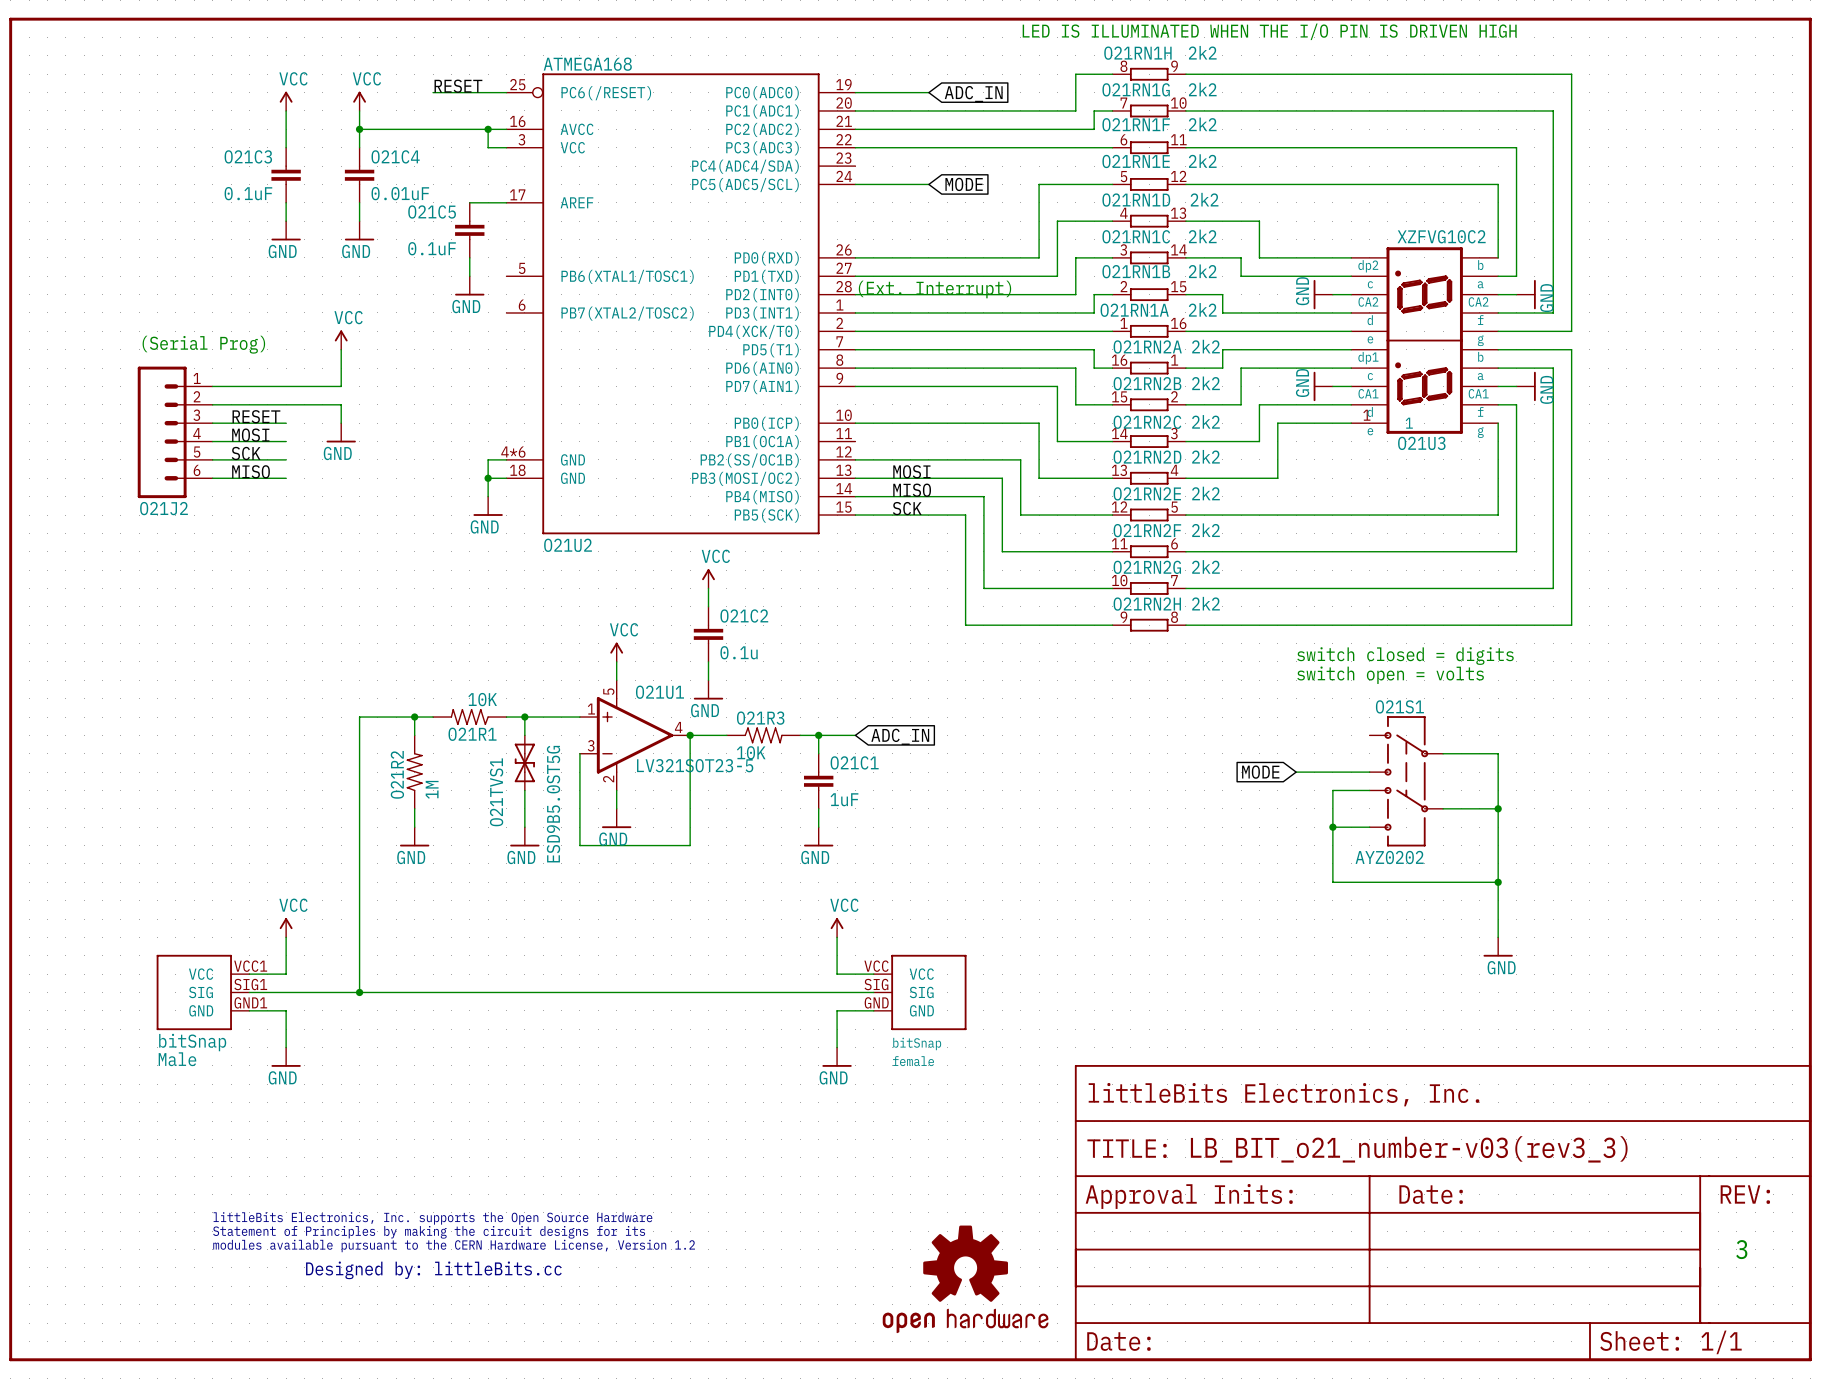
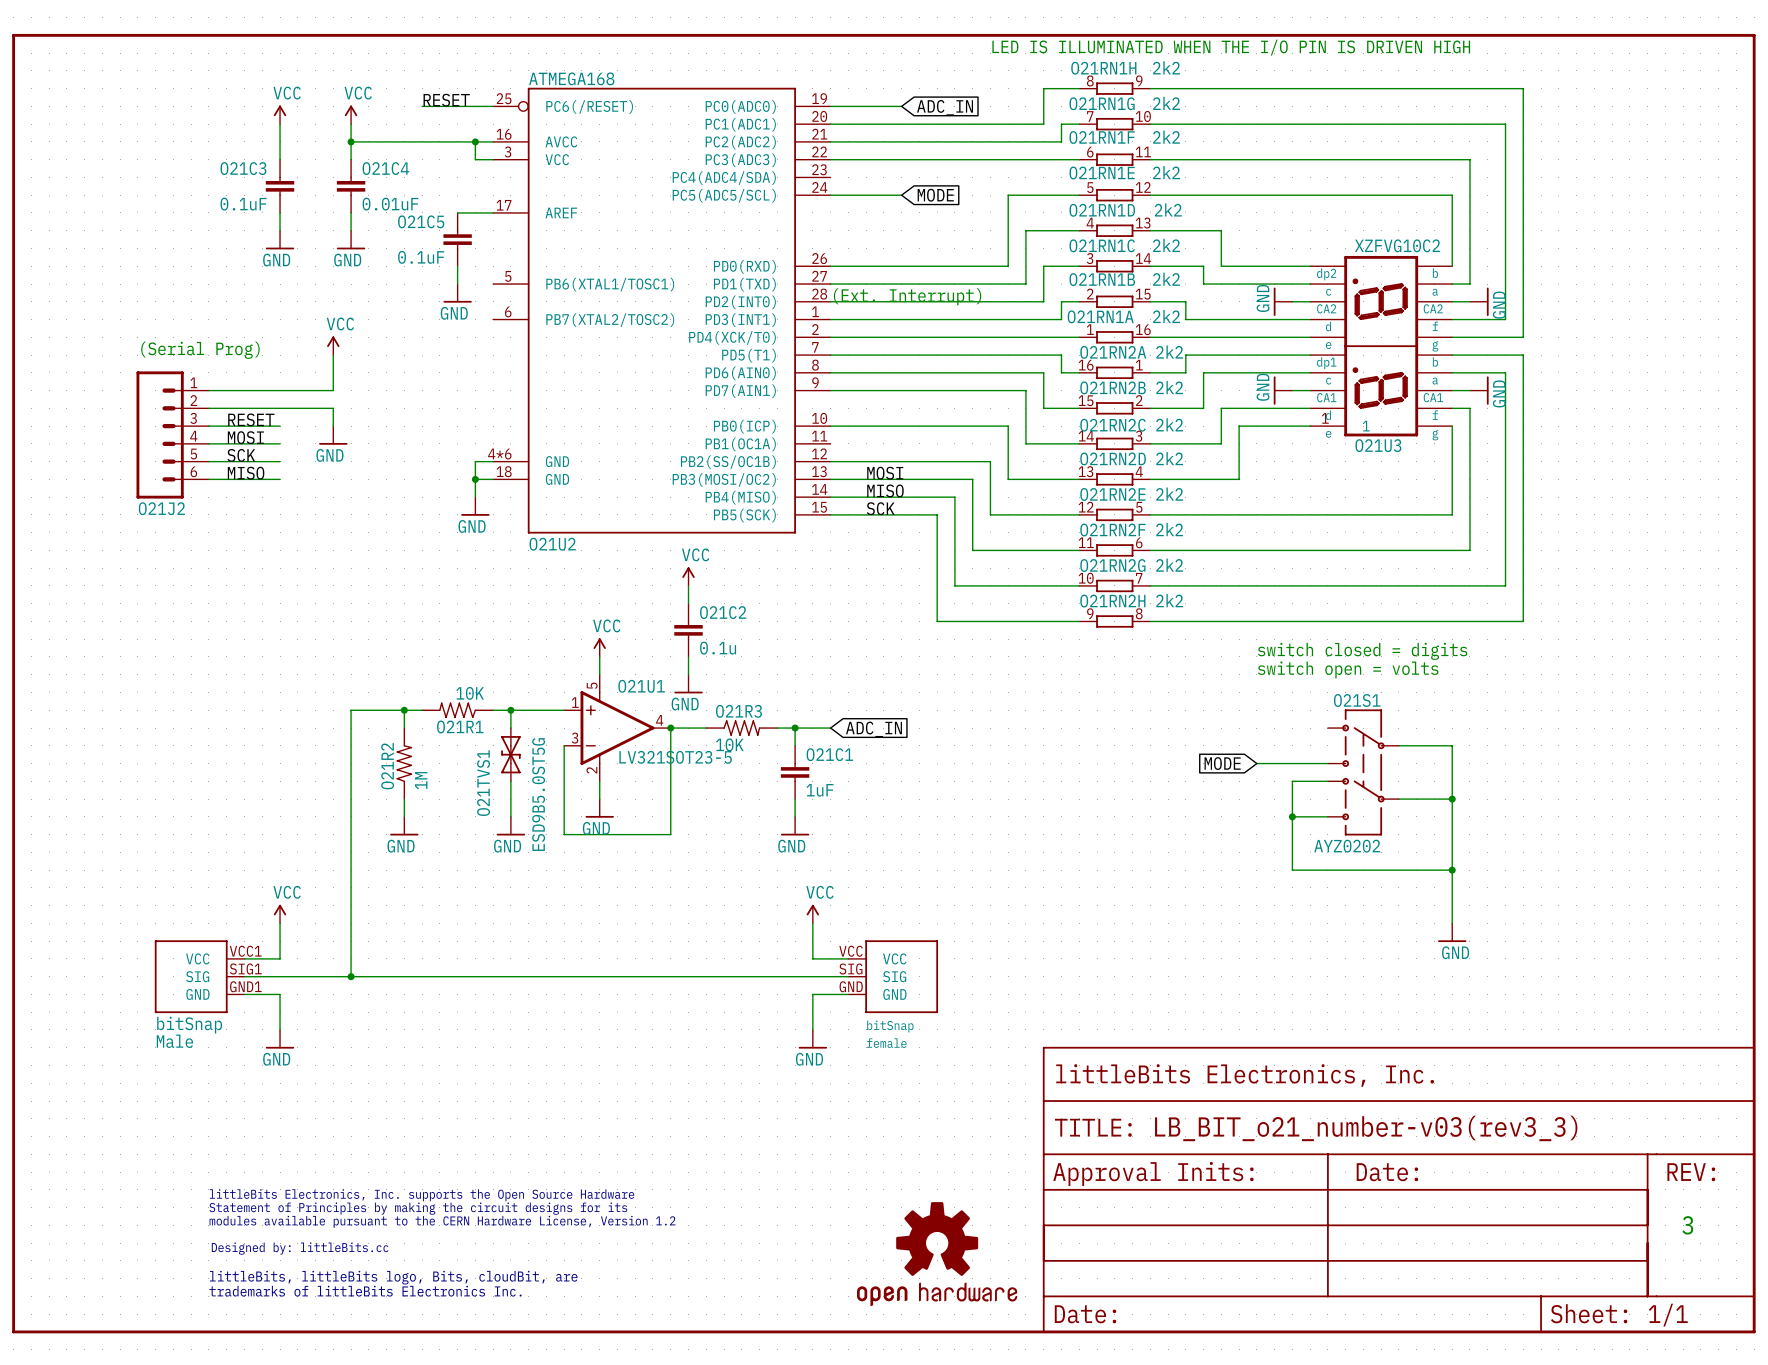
part: (454, 1245) -> none
part: none -> (442, 1242)

